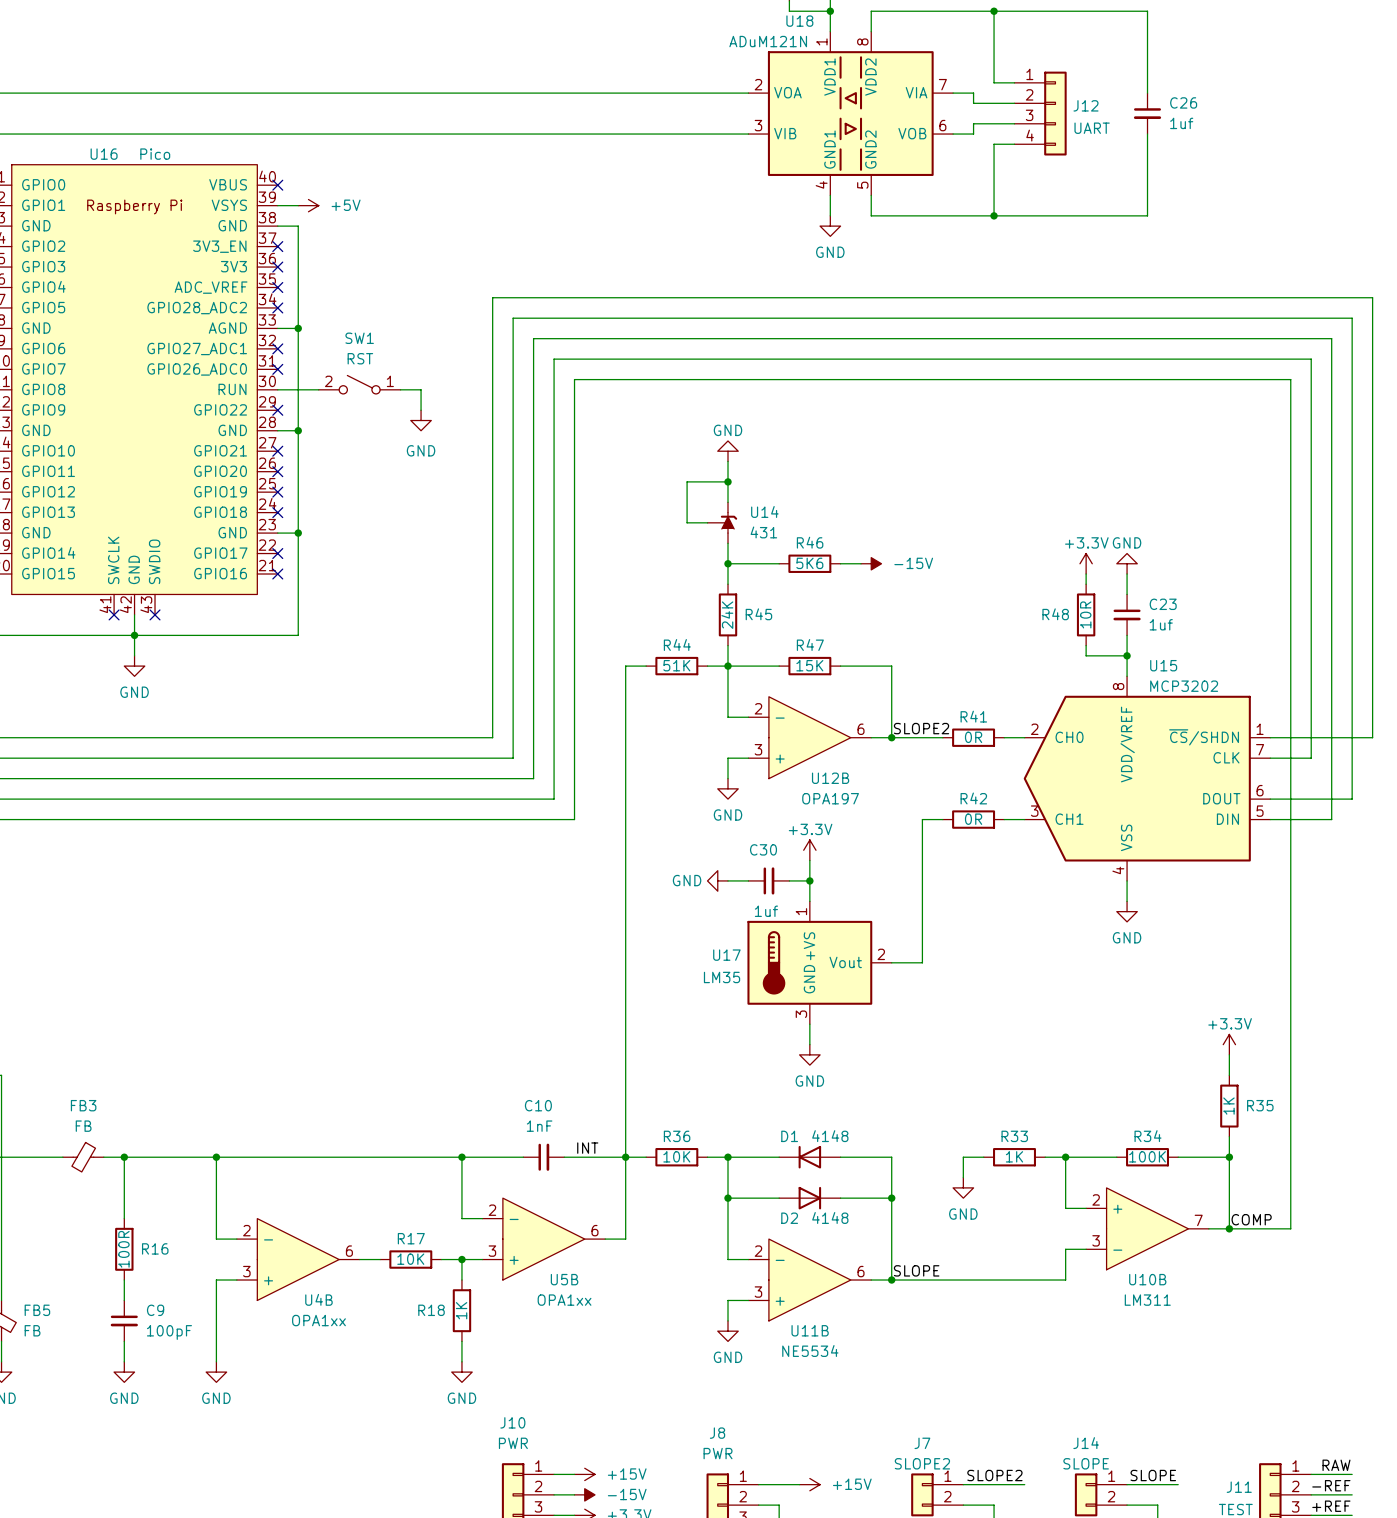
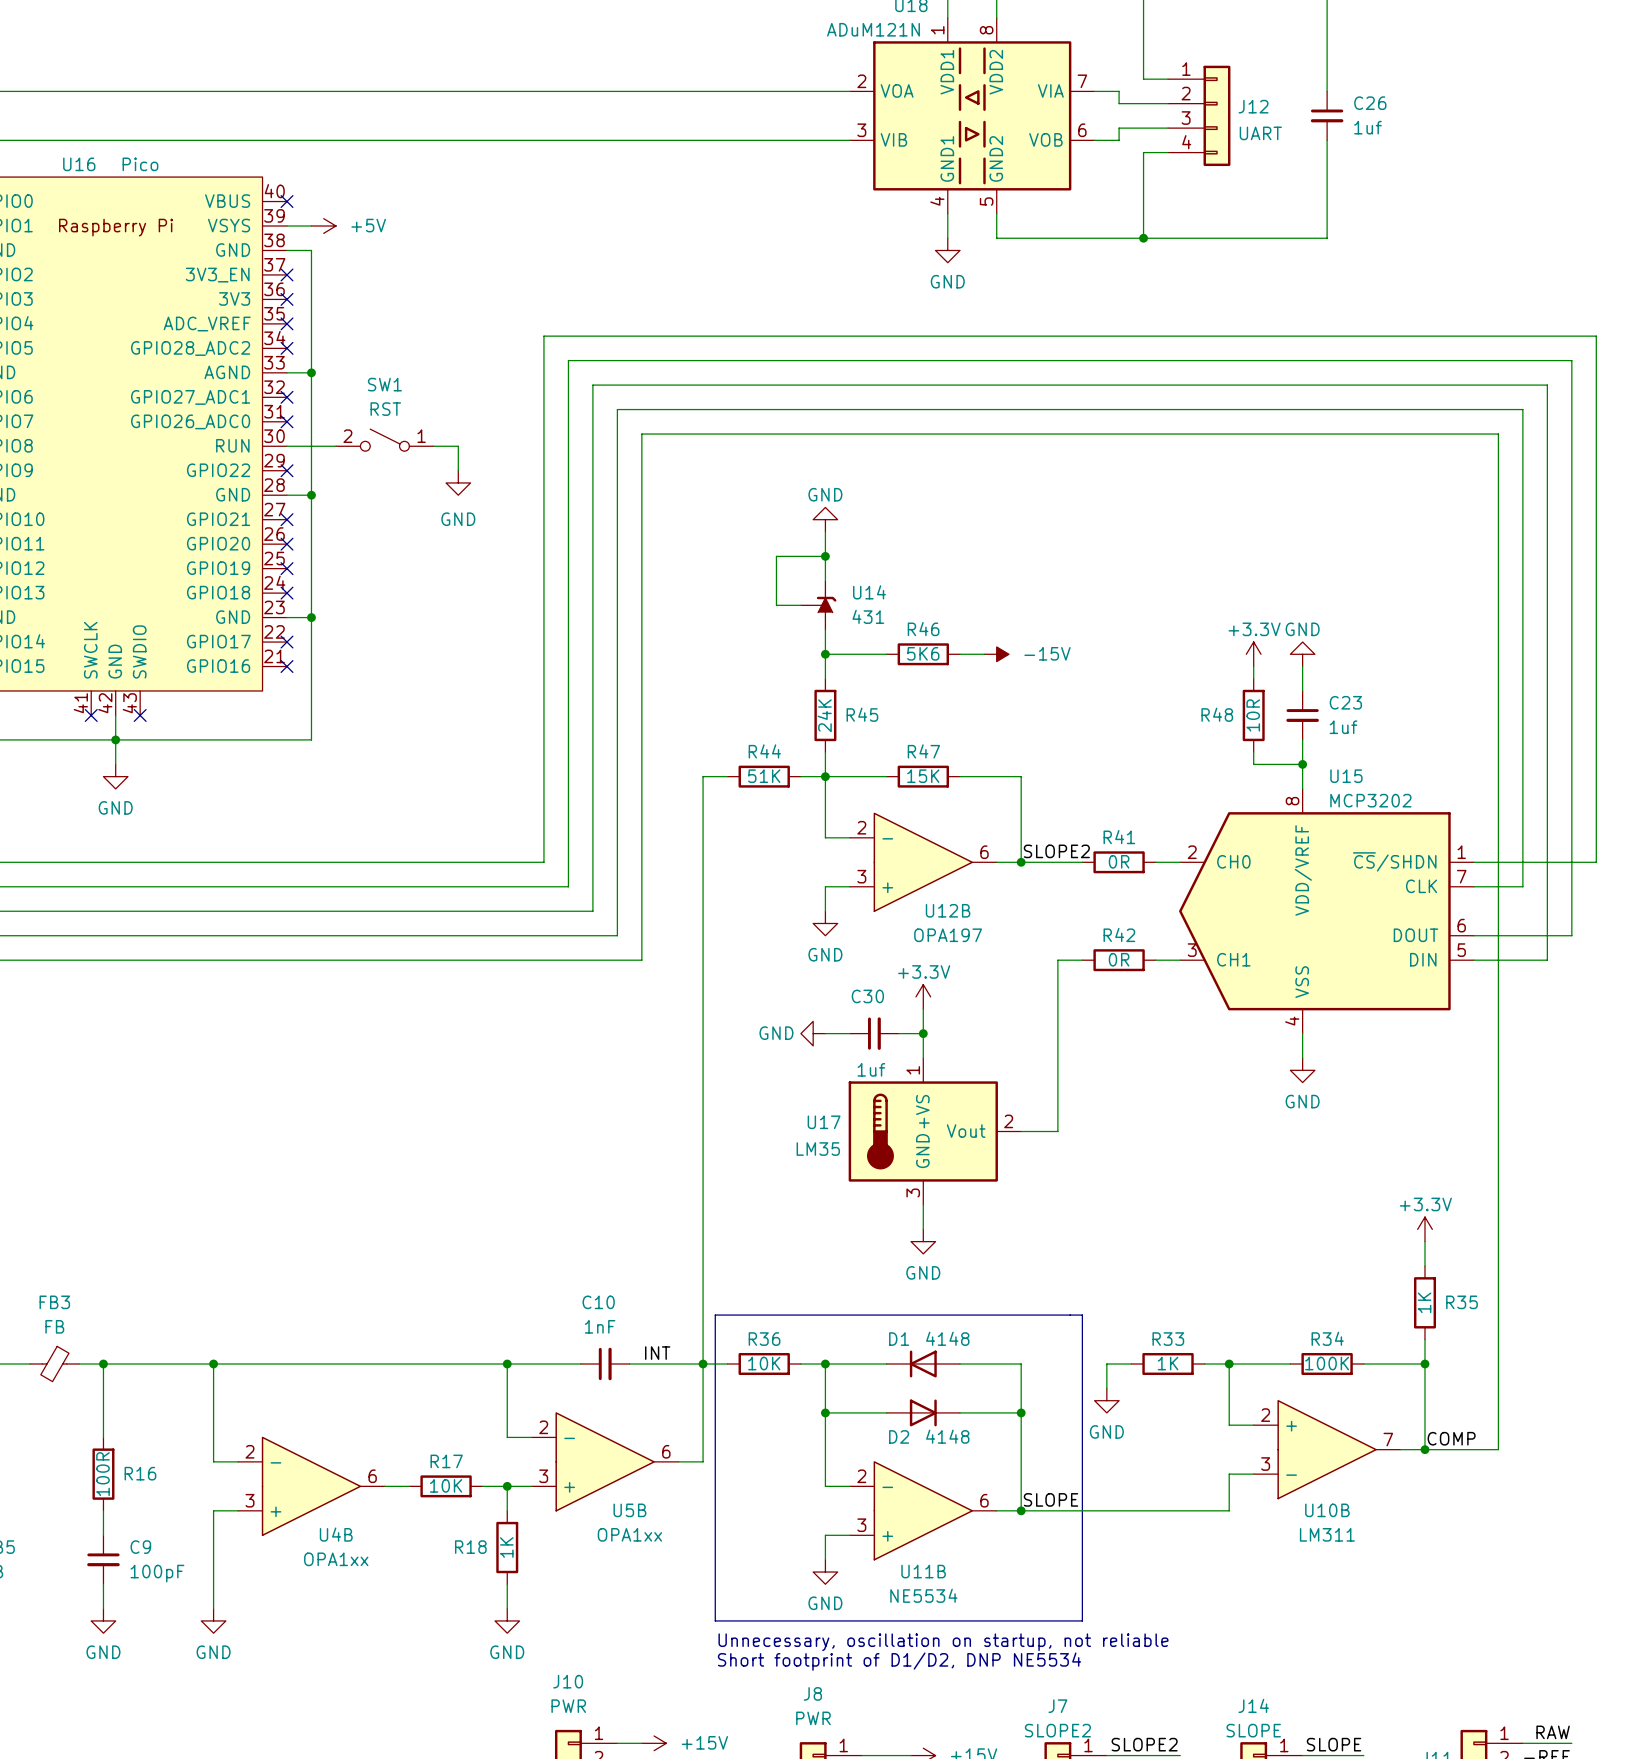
line: none -> (715, 1315) (1082, 1315) (1082, 1620) (715, 1620) (715, 1315)
text: none -> Unnecessary, oscillation on startup, not reliable (943, 1642)
text: none -> Short footprint of D1/D2, DNP NE5534 (899, 1661)

